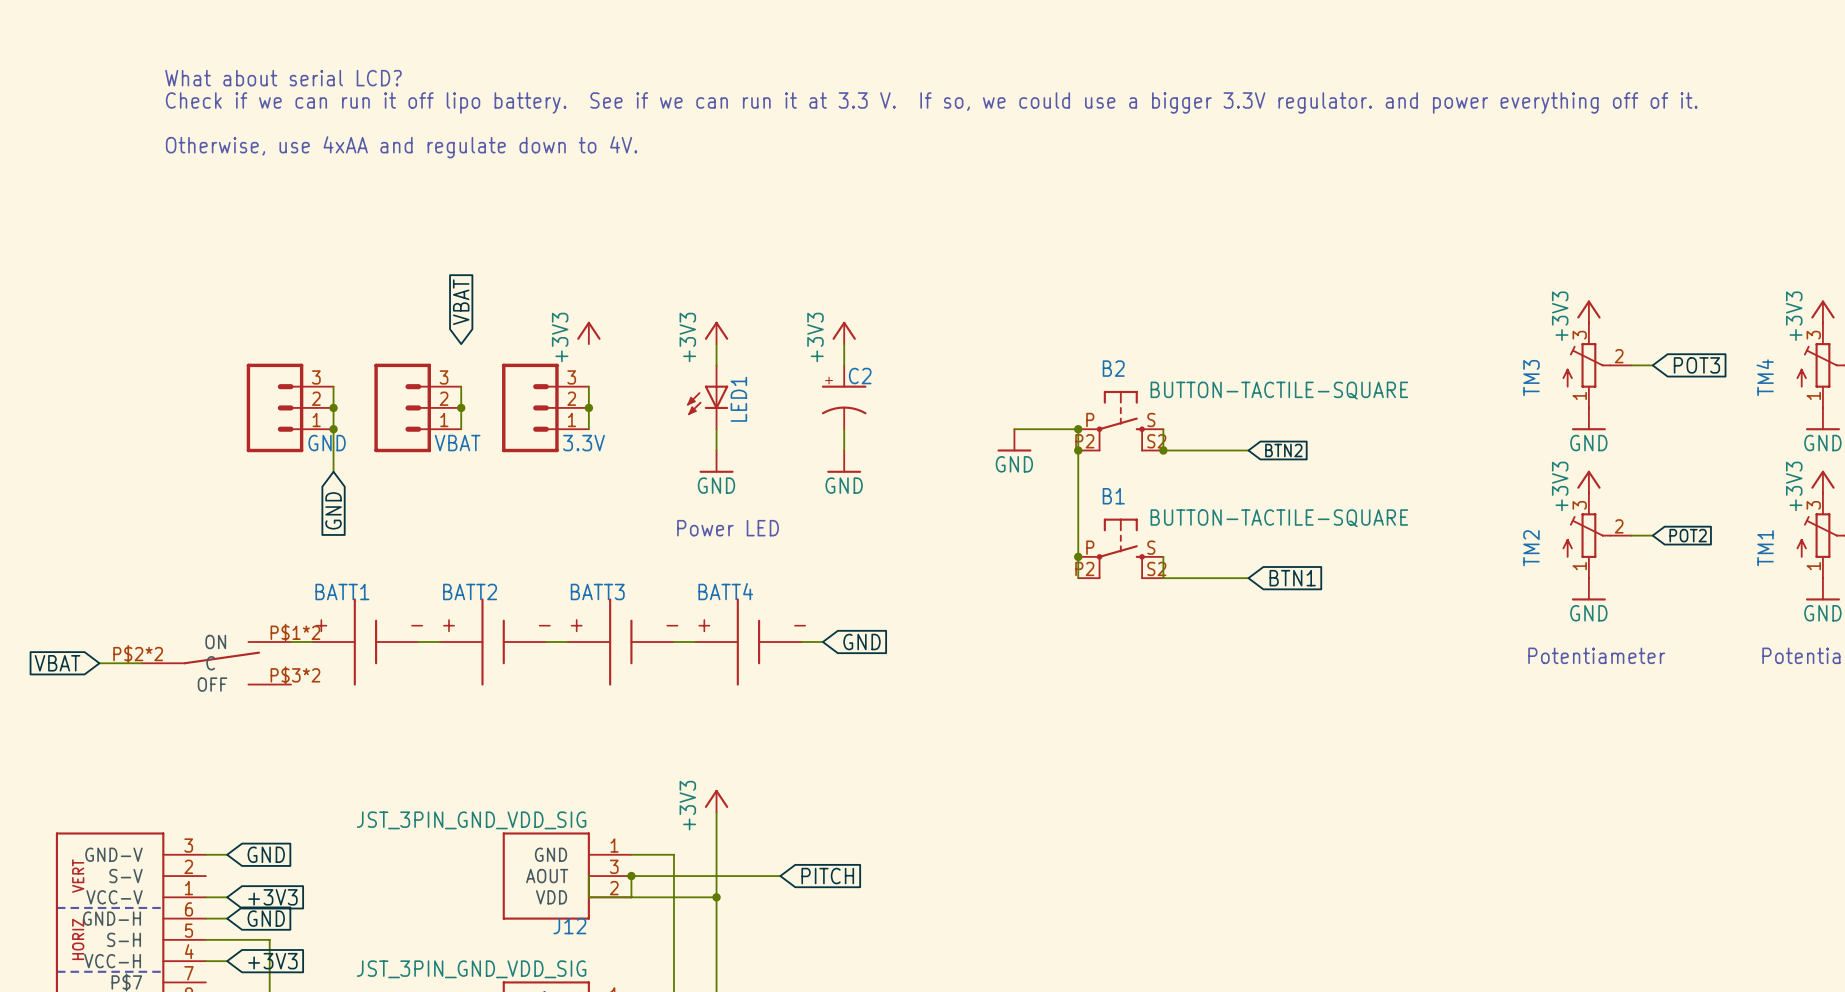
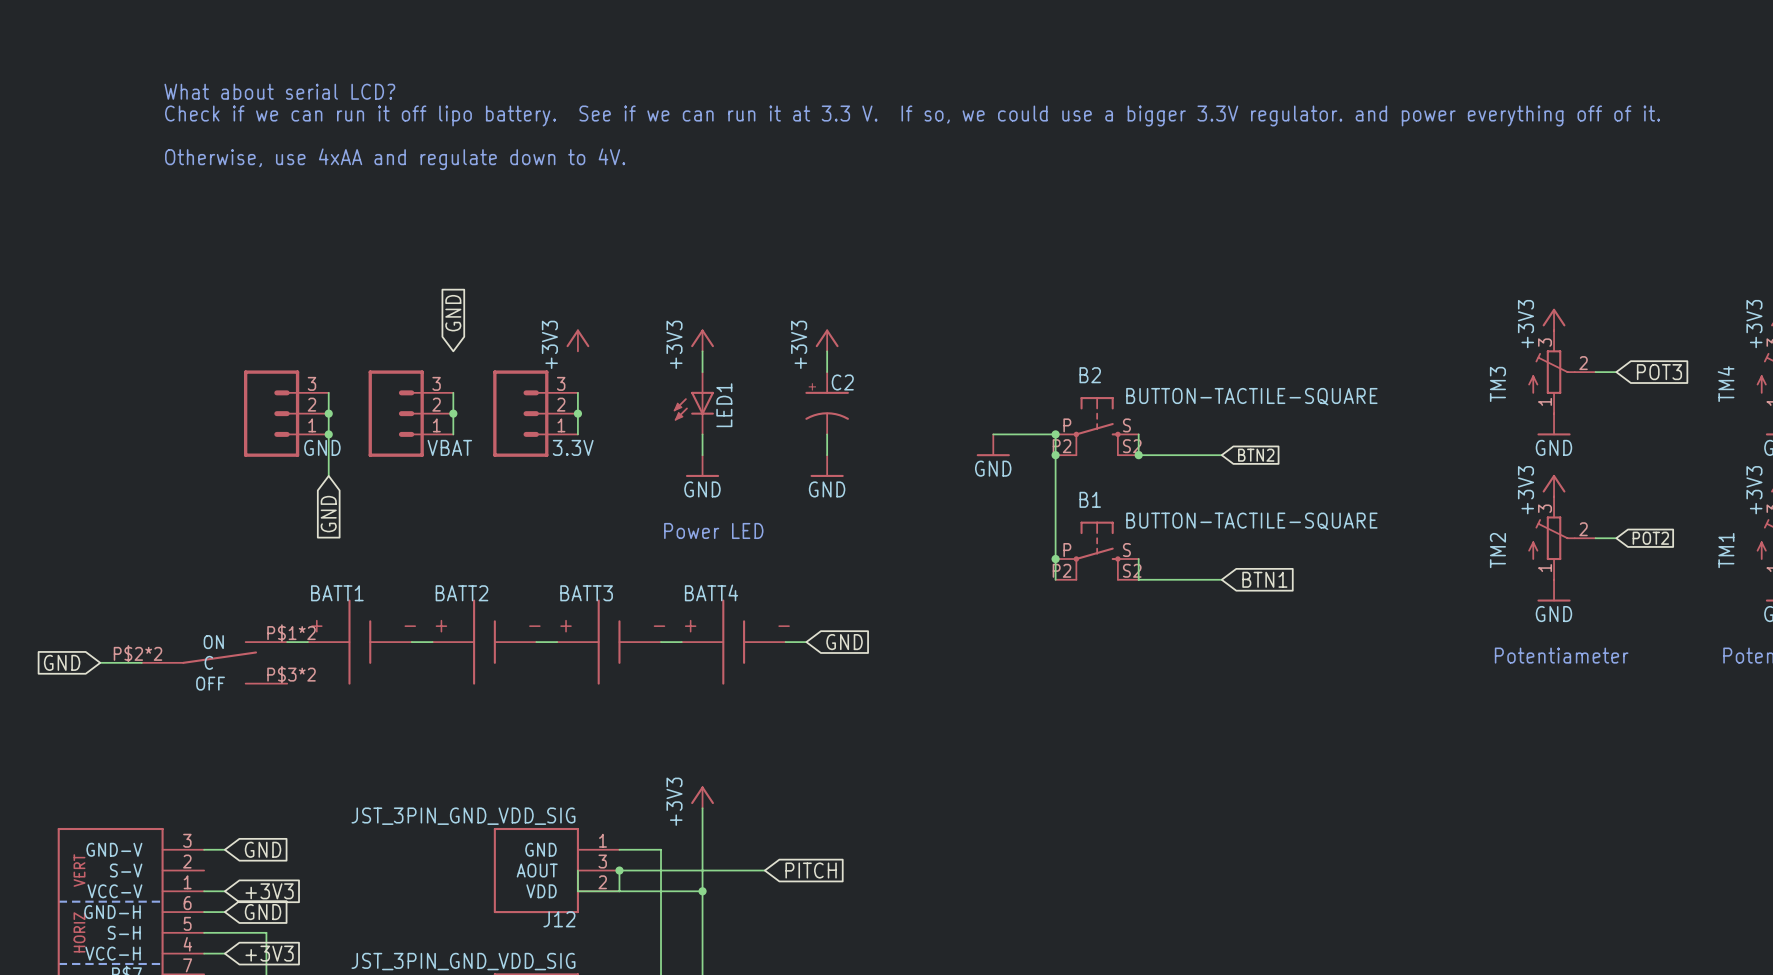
global label: VBAT (461, 302) -> GND (453, 313)
global label: VBAT (57, 663) -> GND (62, 662)

